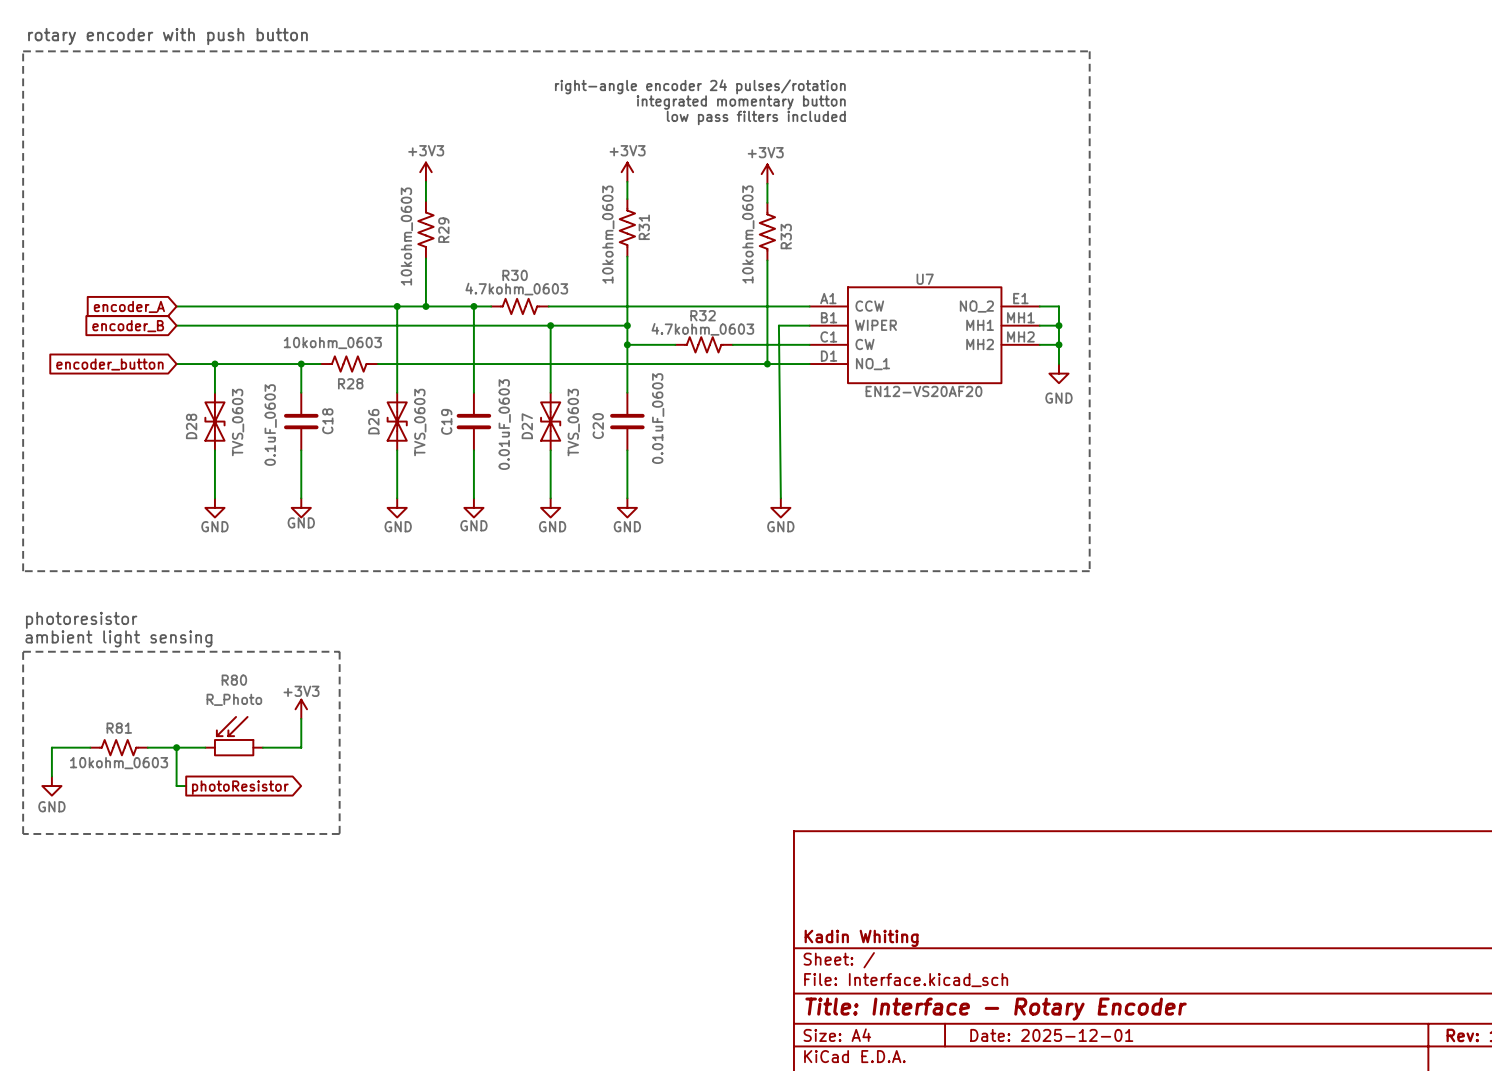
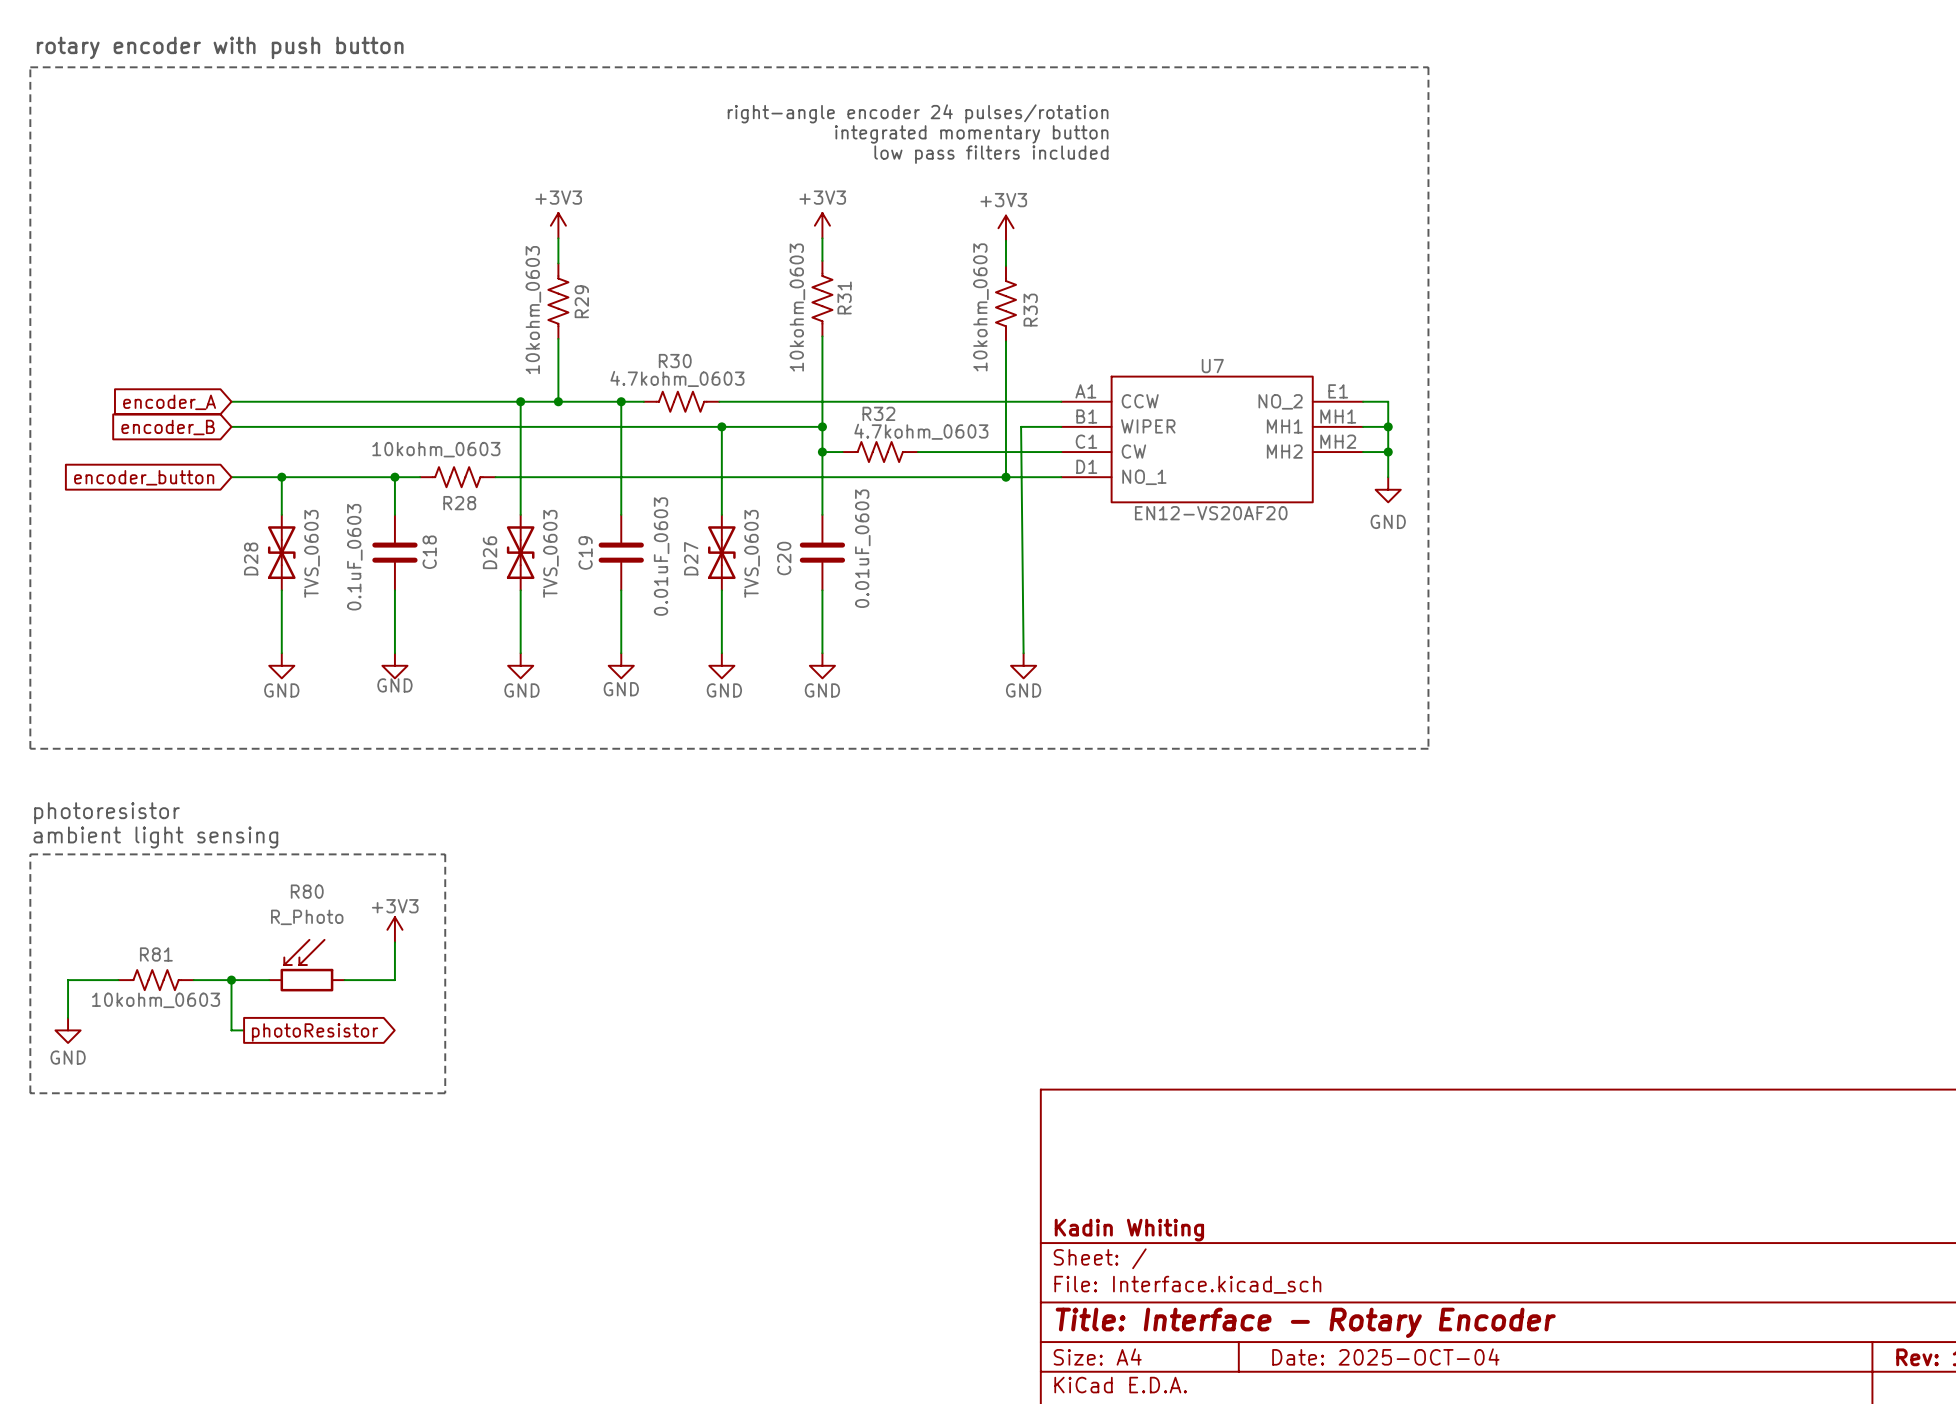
R32 position: (704, 344) -> (880, 452)
title block: Date: 2025-12-01 (1051, 1035) -> Date: 2025-OCT-04 (1385, 1356)

